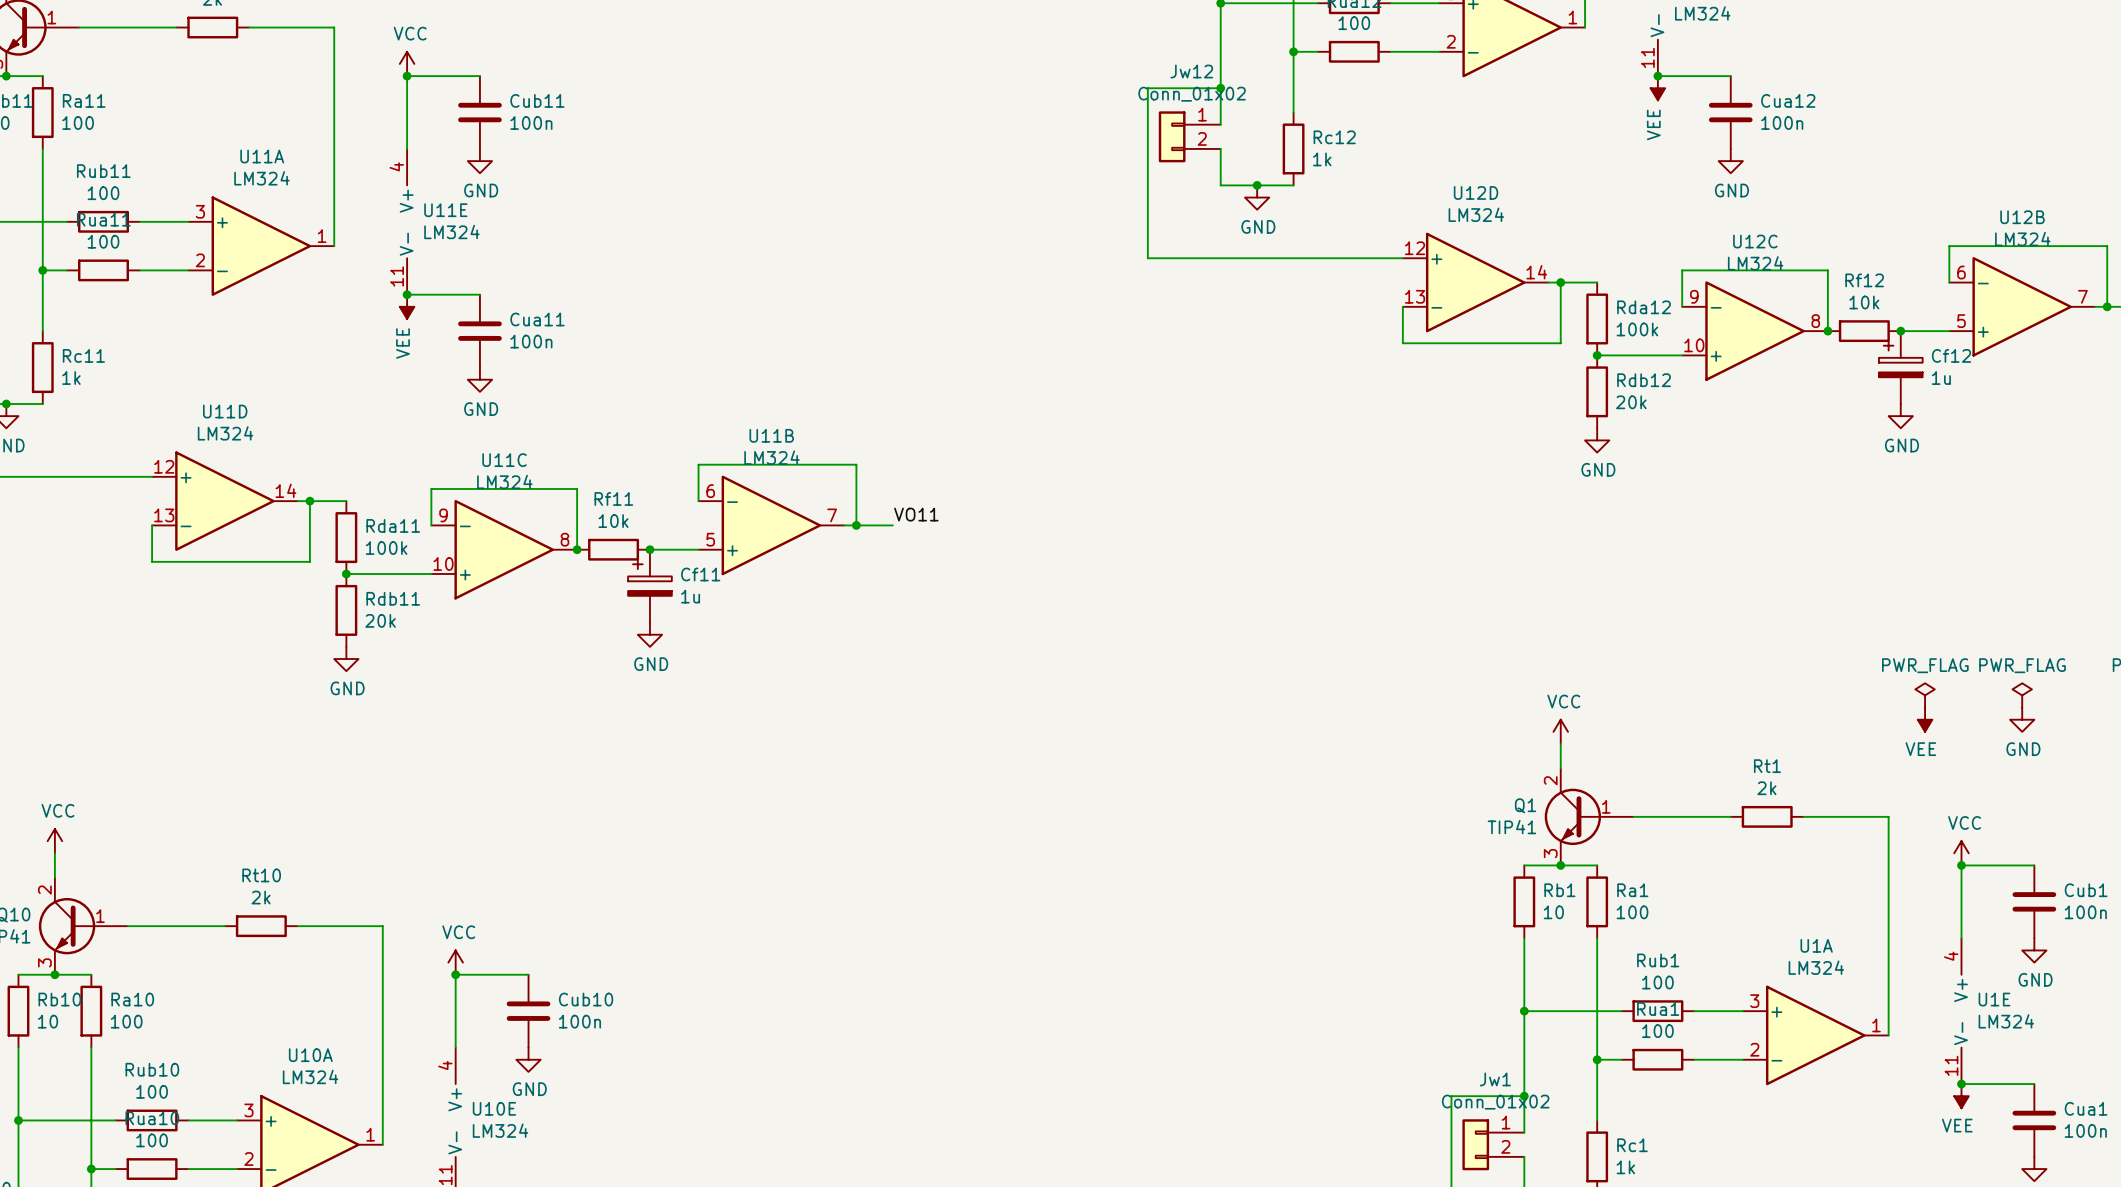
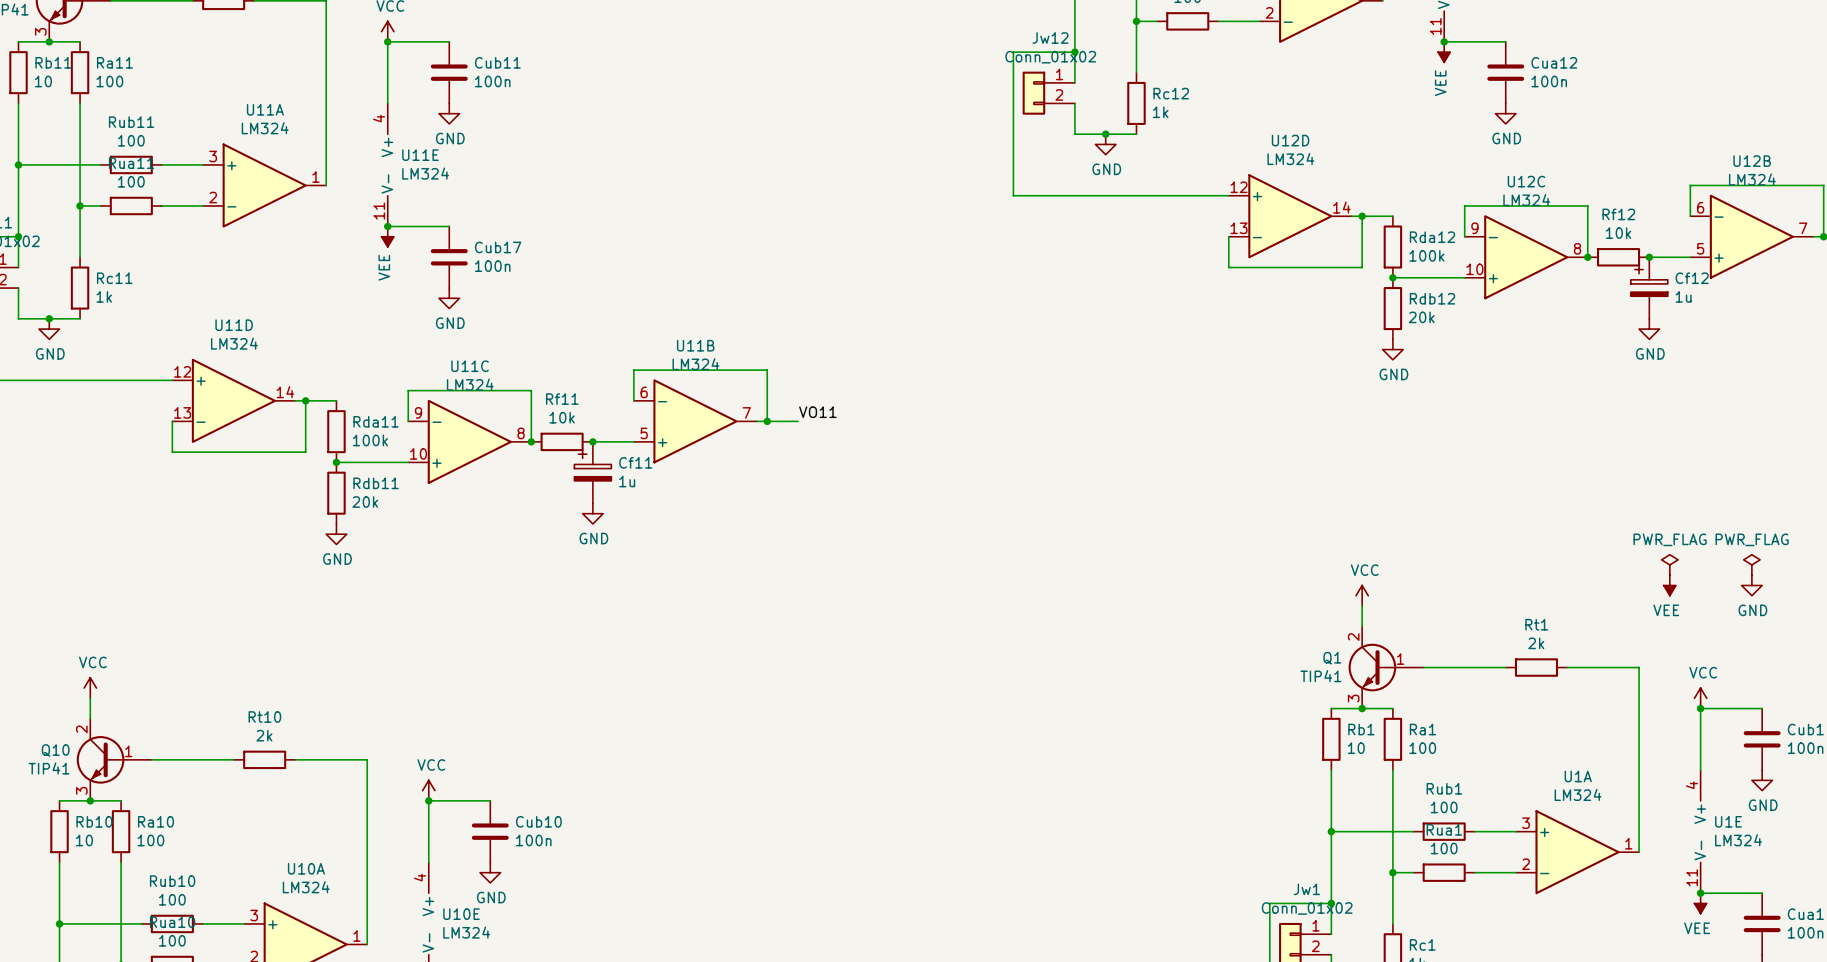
Cua11 name: Cua11 (537, 319) -> Cub17 (498, 247)

